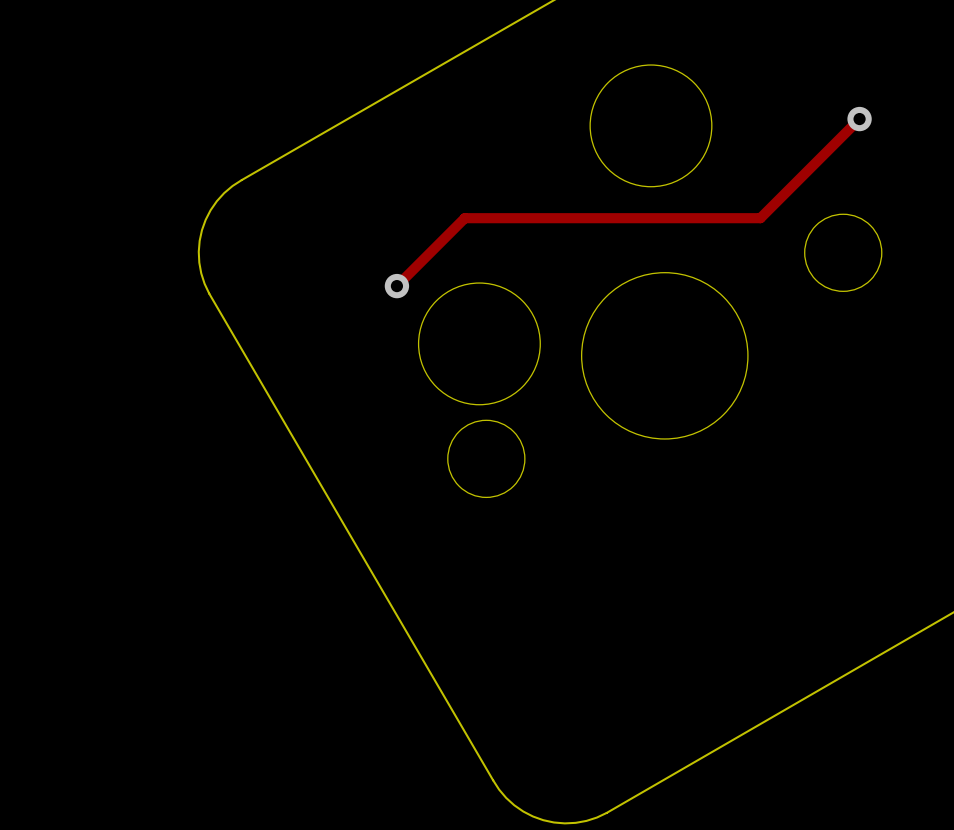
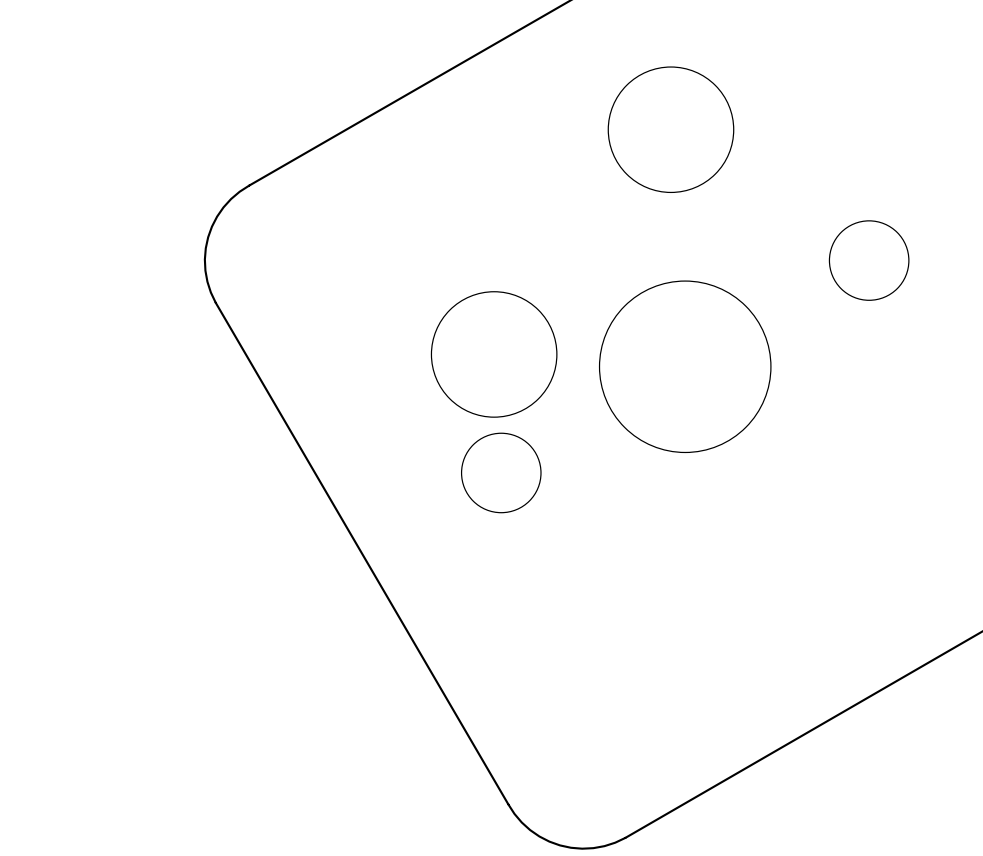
track: (859, 119) (760, 218) (464, 218) (396, 286) -> none
via: (859, 119) -> none
via: (396, 286) -> none

